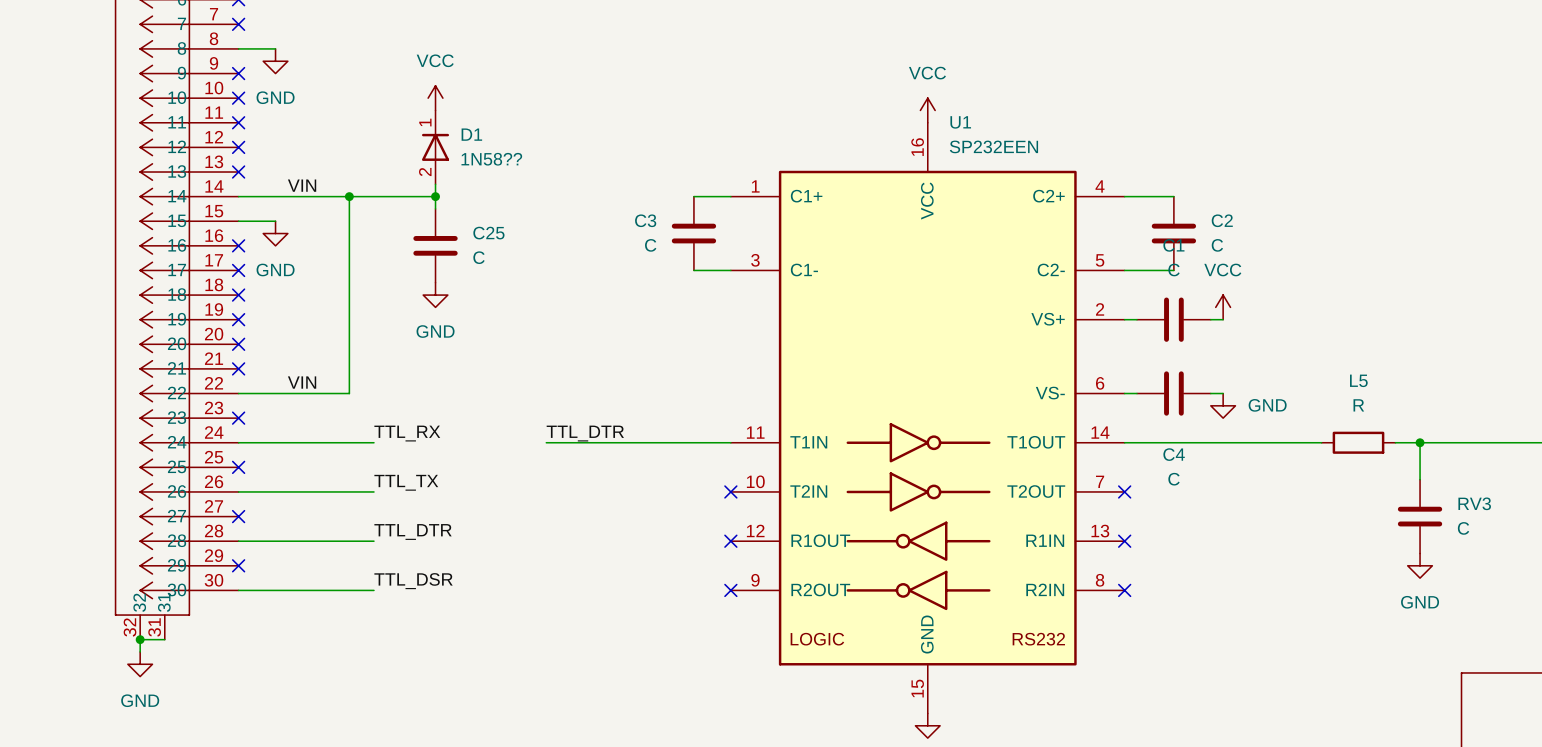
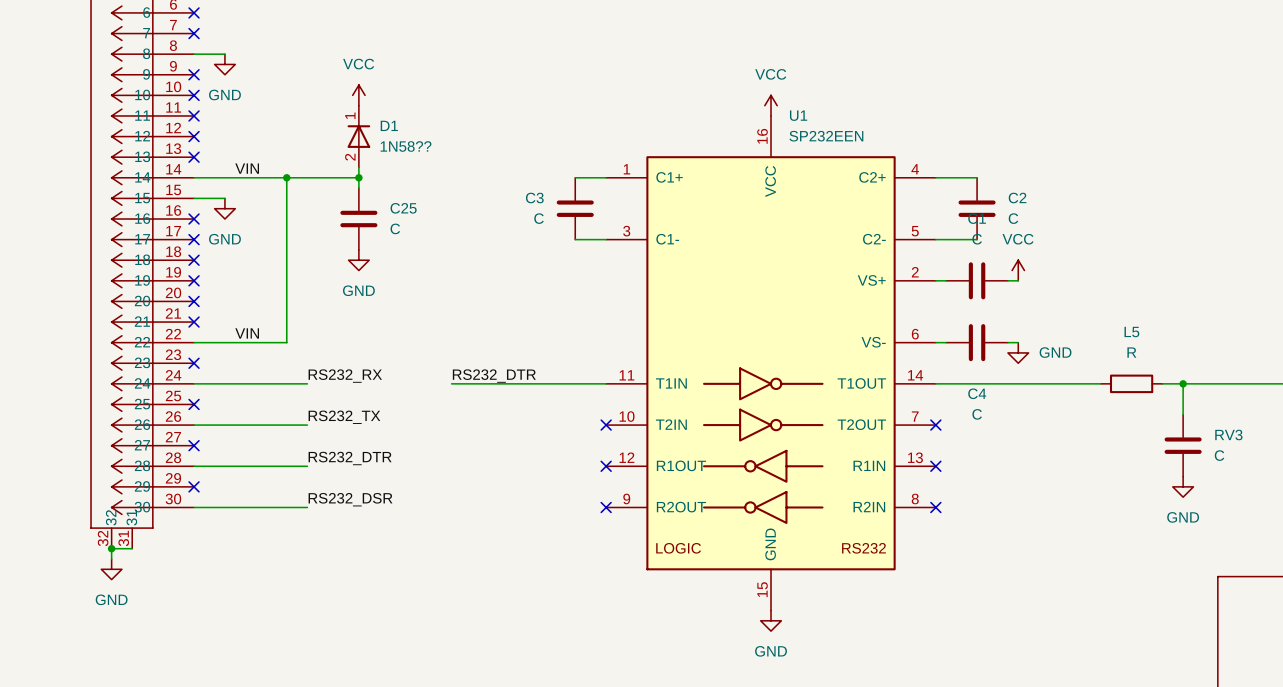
label: TTL_RX (407, 433) -> RS232_RX (345, 376)
label: TTL_DTR (585, 433) -> RS232_DTR (494, 376)
label: TTL_TX (406, 482) -> RS232_TX (344, 417)
label: TTL_DTR (413, 531) -> RS232_DTR (350, 458)
label: TTL_DSR (413, 581) -> RS232_DSR (350, 499)

